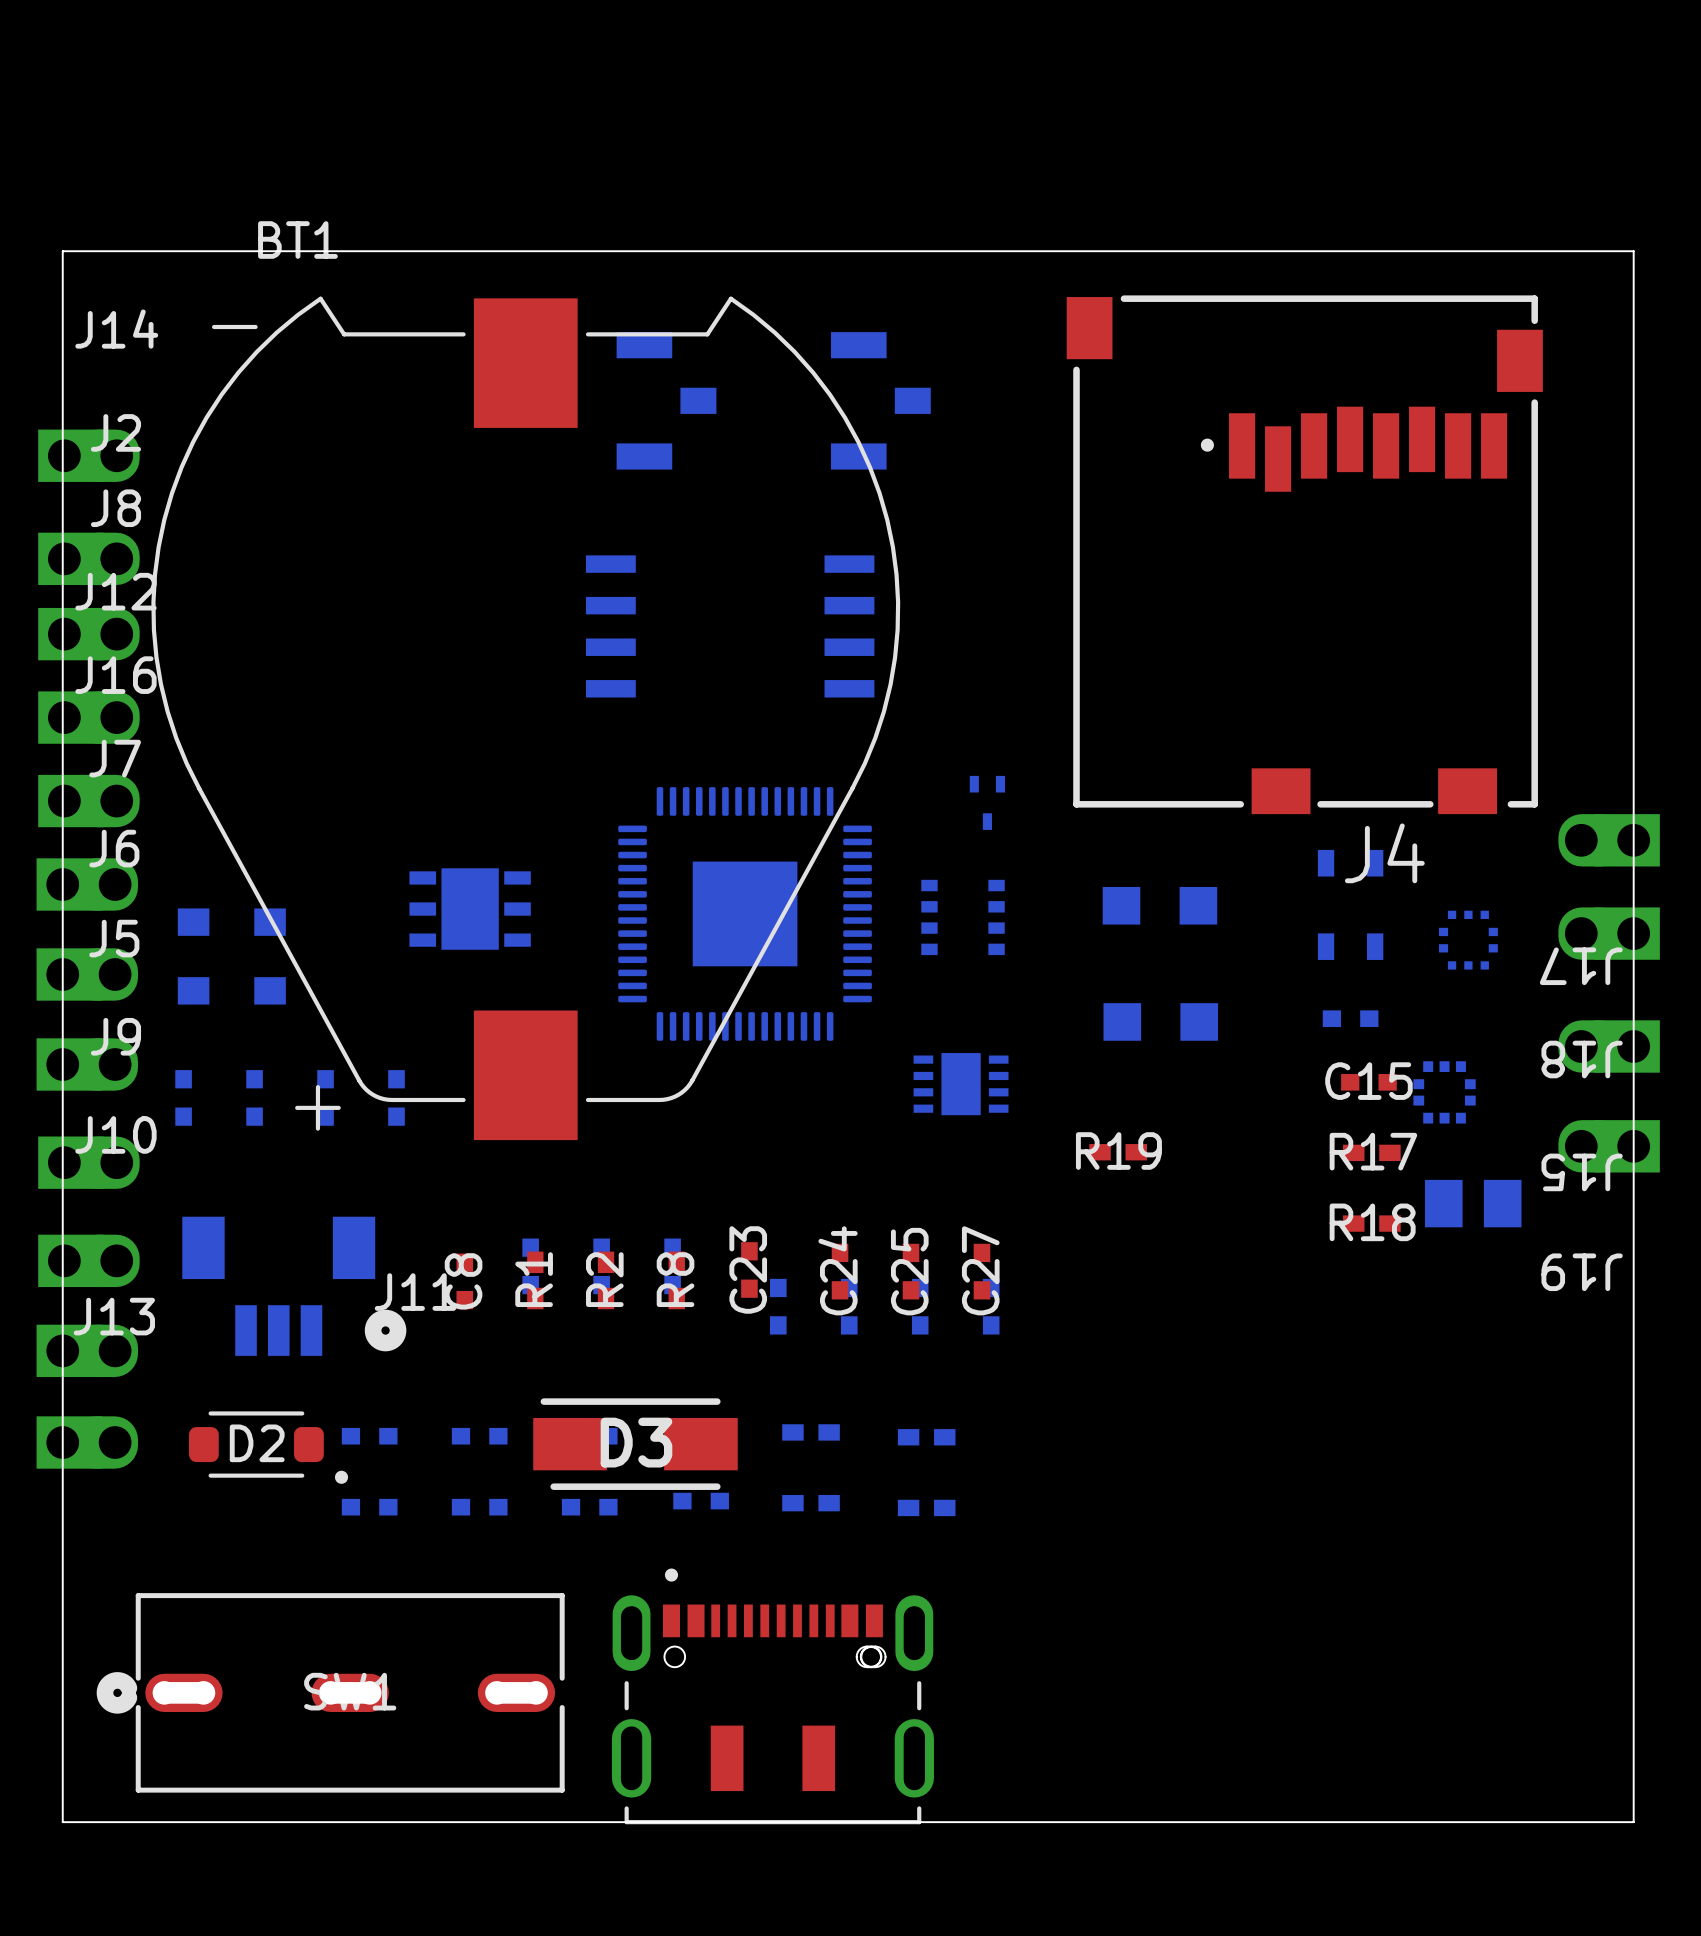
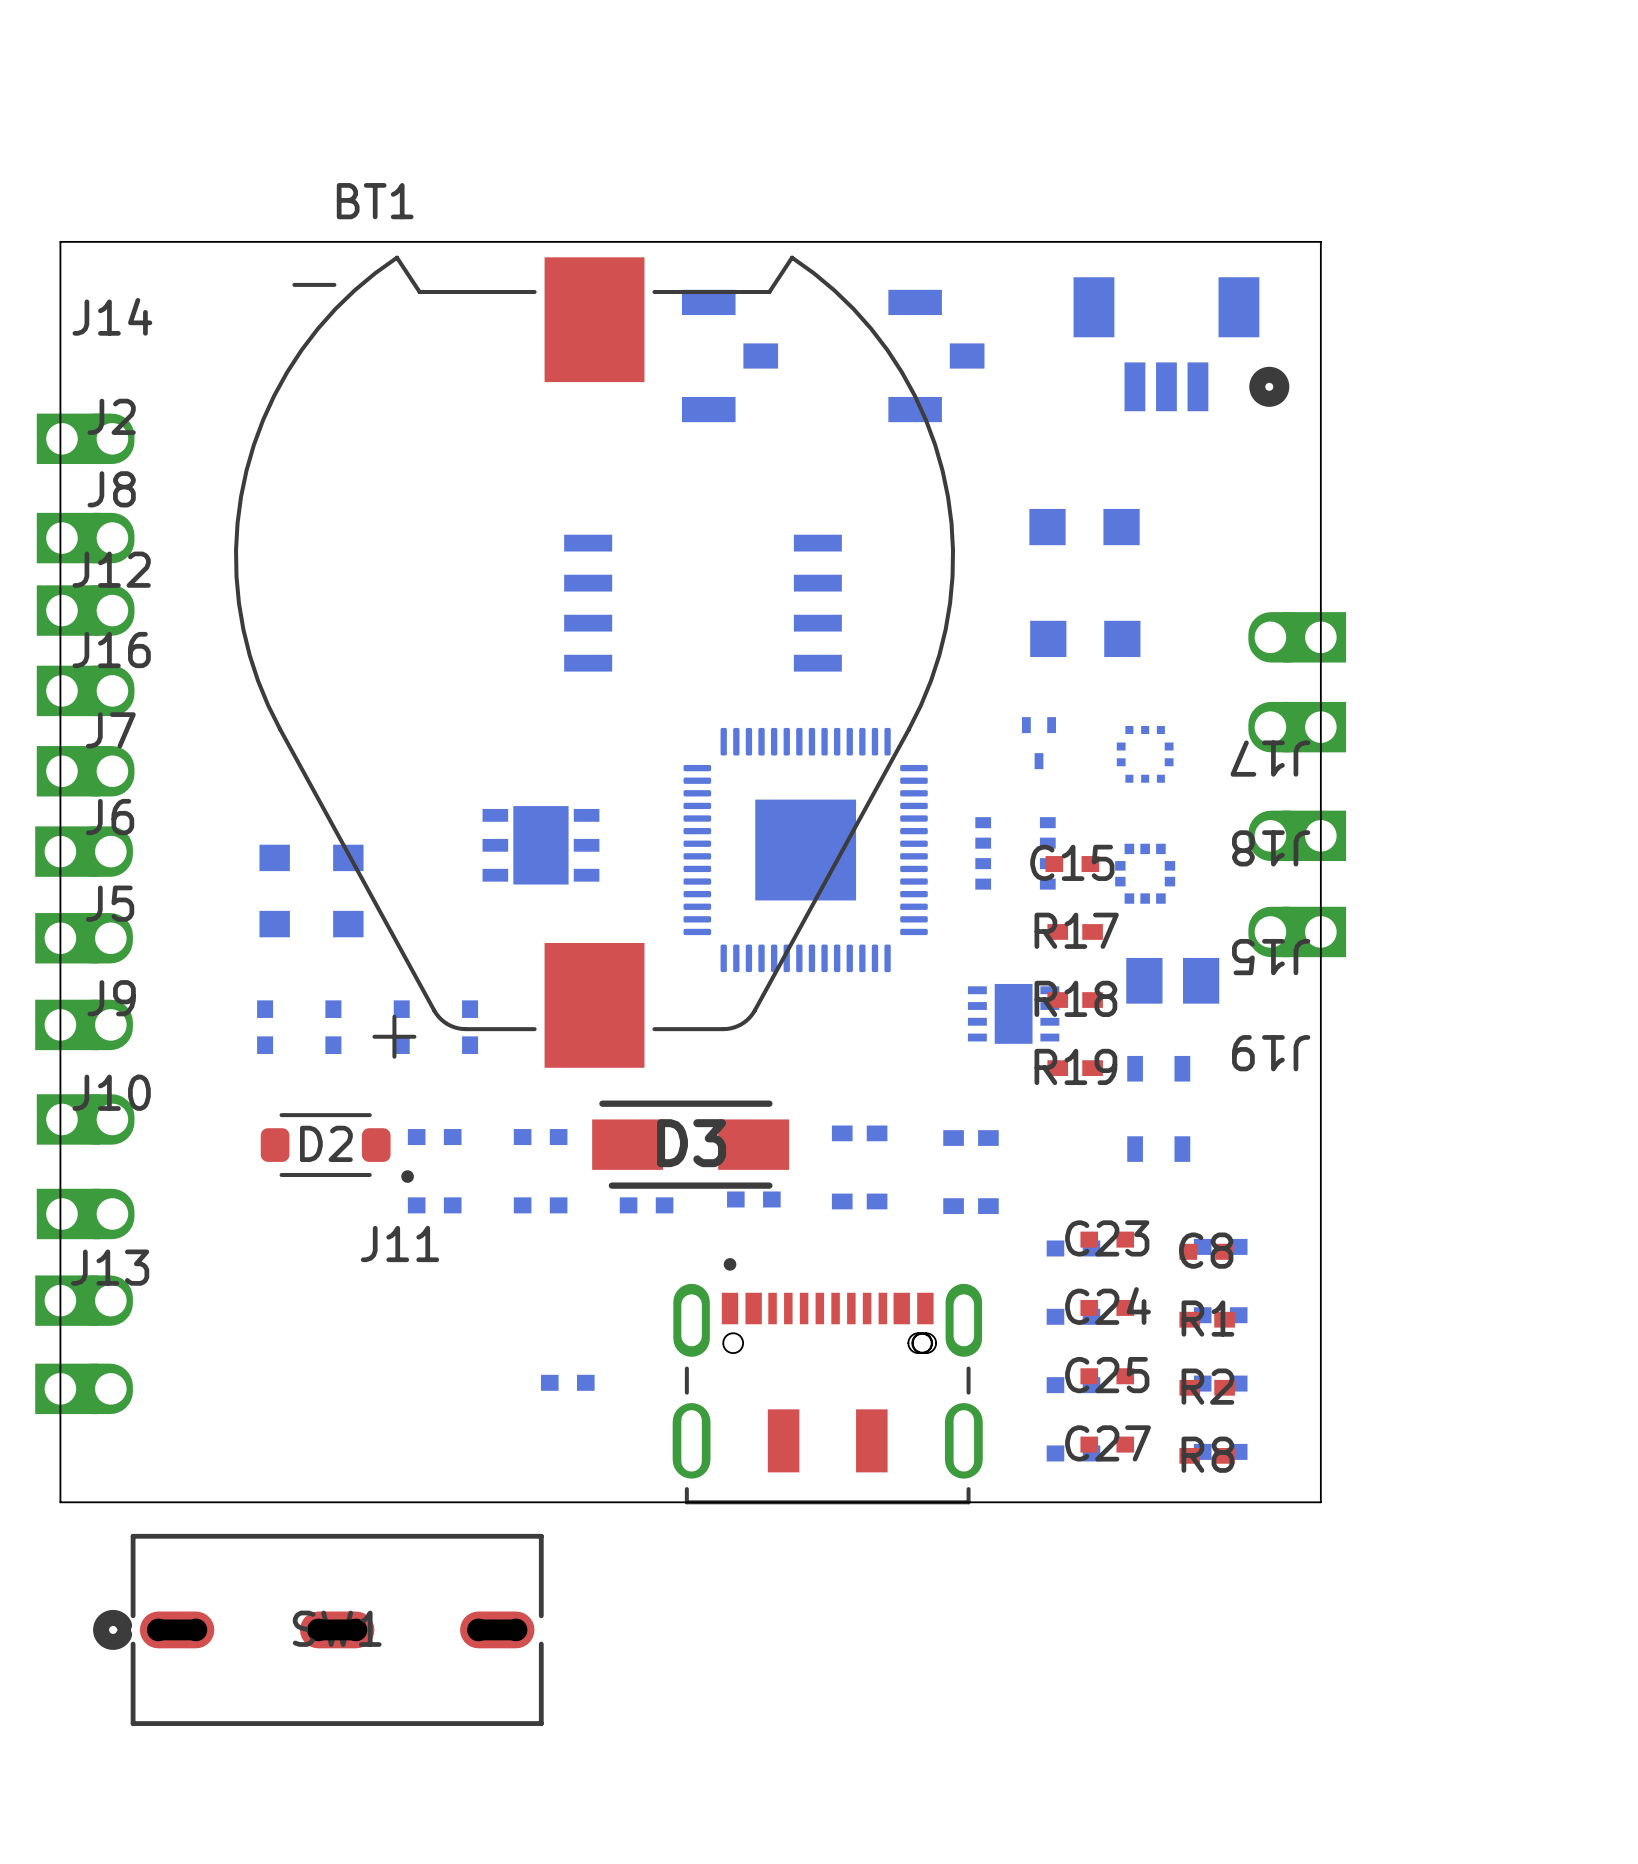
board edge: (1371, 251) (1633, 251) (1633, 1822) (62, 1822) (62, 1560) -> (1320, 241) (1320, 1502) (60, 1502)
part: none -> (1181, 344)
part: none -> (730, 355)
part: none -> (936, 355)
part: (666, 400) -> none
part: (880, 400) -> none
part: none -> (1084, 527)
J4: (1304, 554) -> none
part: none -> (1085, 638)
BT1 position: (525, 718) -> (594, 661)
part position: (987, 802) -> (1038, 743)
J17 position: (1609, 840) -> (1297, 637)
part: (1350, 863) -> none
part footprint: [1102, 886, 1218, 925] -> [1115, 843, 1176, 904]
part position: (470, 909) -> (540, 845)
part position: (745, 913) -> (805, 850)
part position: (963, 917) -> (1015, 853)
J18 position: (1609, 933) -> (1297, 727)
part position: (1468, 940) -> (1145, 754)
part: (1350, 946) -> none
part position: (231, 956) -> (311, 890)
part: (1350, 1018) -> none
part: (1160, 1021) -> none
J15 position: (1609, 1046) -> (1297, 835)
part: none -> (265, 1027)
part: none -> (333, 1027)
part: none -> (401, 1027)
part: none -> (470, 1027)
C15 position: (1368, 1082) -> (1072, 864)
part position: (961, 1084) -> (1013, 1013)
part: (1444, 1092) -> none
part: (183, 1097) -> none
part: (254, 1097) -> none
part: (325, 1097) -> none
part: (396, 1097) -> none
part: none -> (1158, 1068)
J19 position: (1609, 1146) -> (1297, 931)
R19 position: (1118, 1152) -> (1075, 1068)
R17 position: (1371, 1152) -> (1075, 931)
part: none -> (859, 1133)
part: none -> (434, 1137)
part: none -> (540, 1137)
part: none -> (970, 1138)
part: none -> (1158, 1149)
part position: (1473, 1203) -> (1172, 980)
R18 position: (1371, 1223) -> (1075, 1000)
part: none -> (753, 1199)
part: none -> (859, 1201)
part: none -> (434, 1205)
part: none -> (540, 1205)
part: none -> (970, 1206)
part: (530, 1266) -> none
part: (601, 1266) -> none
part rotation: 0° (672, 1266) -> 90° clockwise (646, 1205)
C23 rotation: 0° (749, 1269) -> 90° clockwise (1107, 1239)
C23 position: (749, 1269) -> (1107, 1239)
C24 rotation: 0° (840, 1271) -> 90° clockwise (1107, 1307)
C24 position: (840, 1271) -> (1107, 1307)
C25 rotation: 0° (911, 1271) -> 90° clockwise (1107, 1376)
C25 position: (911, 1271) -> (1107, 1376)
C27 rotation: 0° (981, 1271) -> 90° clockwise (1107, 1444)
C27 position: (981, 1271) -> (1107, 1444)
R1 rotation: 0° (535, 1280) -> 90° clockwise (1207, 1319)
R1 position: (535, 1280) -> (1207, 1319)
R2 rotation: 0° (606, 1280) -> 90° clockwise (1207, 1387)
R2 position: (606, 1280) -> (1207, 1387)
R8 rotation: 0° (676, 1280) -> 90° clockwise (1207, 1455)
R8 position: (676, 1280) -> (1207, 1455)
C8 rotation: 0° (464, 1281) -> 90° clockwise (1206, 1251)
C8 position: (464, 1281) -> (1206, 1251)
part: (294, 1286) -> none
part: none -> (1220, 1246)
part: none -> (1073, 1248)
part: (778, 1306) -> none
part: (849, 1306) -> none
part: (920, 1306) -> none
part: (991, 1306) -> none
part: none -> (1220, 1315)
part: none -> (1073, 1316)
part: (811, 1432) -> none
part: (369, 1436) -> none
part: (479, 1436) -> none
part: none -> (1220, 1383)
part: (926, 1437) -> none
part: none -> (1073, 1385)
D3 position: (635, 1444) -> (690, 1144)
D2 position: (268, 1447) -> (337, 1147)
part: (701, 1501) -> none
part: (811, 1503) -> none
part: (369, 1507) -> none
part: (479, 1507) -> none
part: (589, 1507) -> none
part: (926, 1507) -> none
part: none -> (1220, 1451)
part: none -> (1073, 1453)
part position: (772, 1696) -> (827, 1381)

